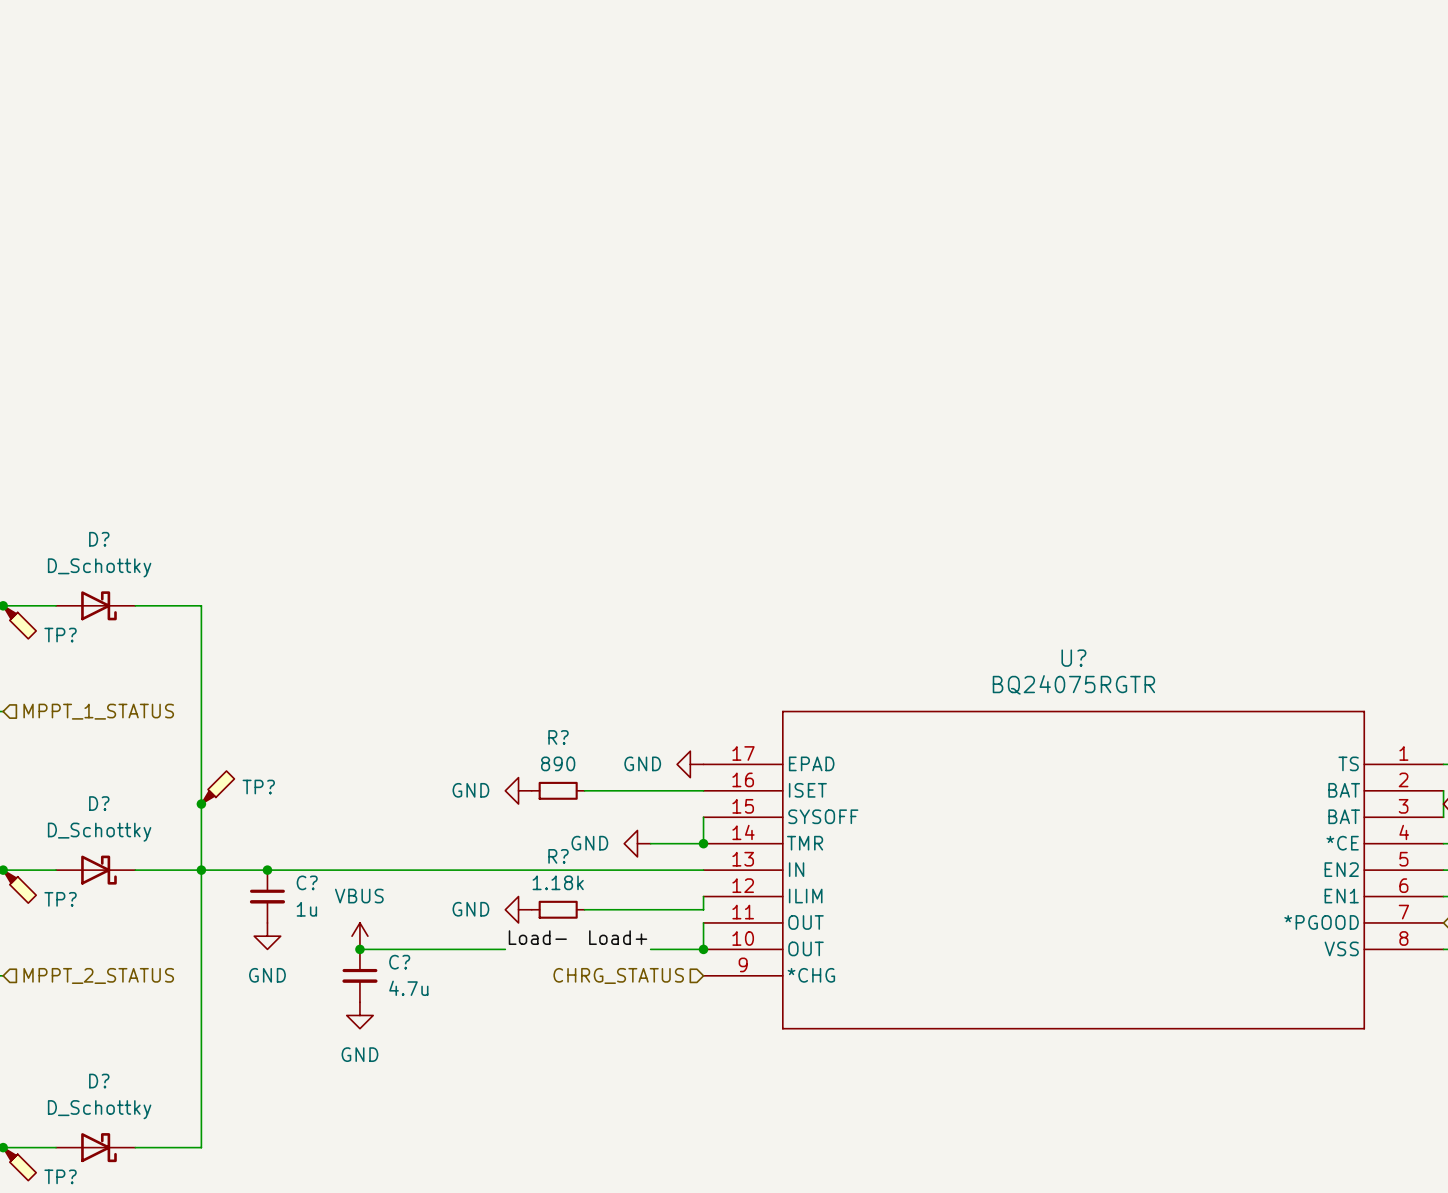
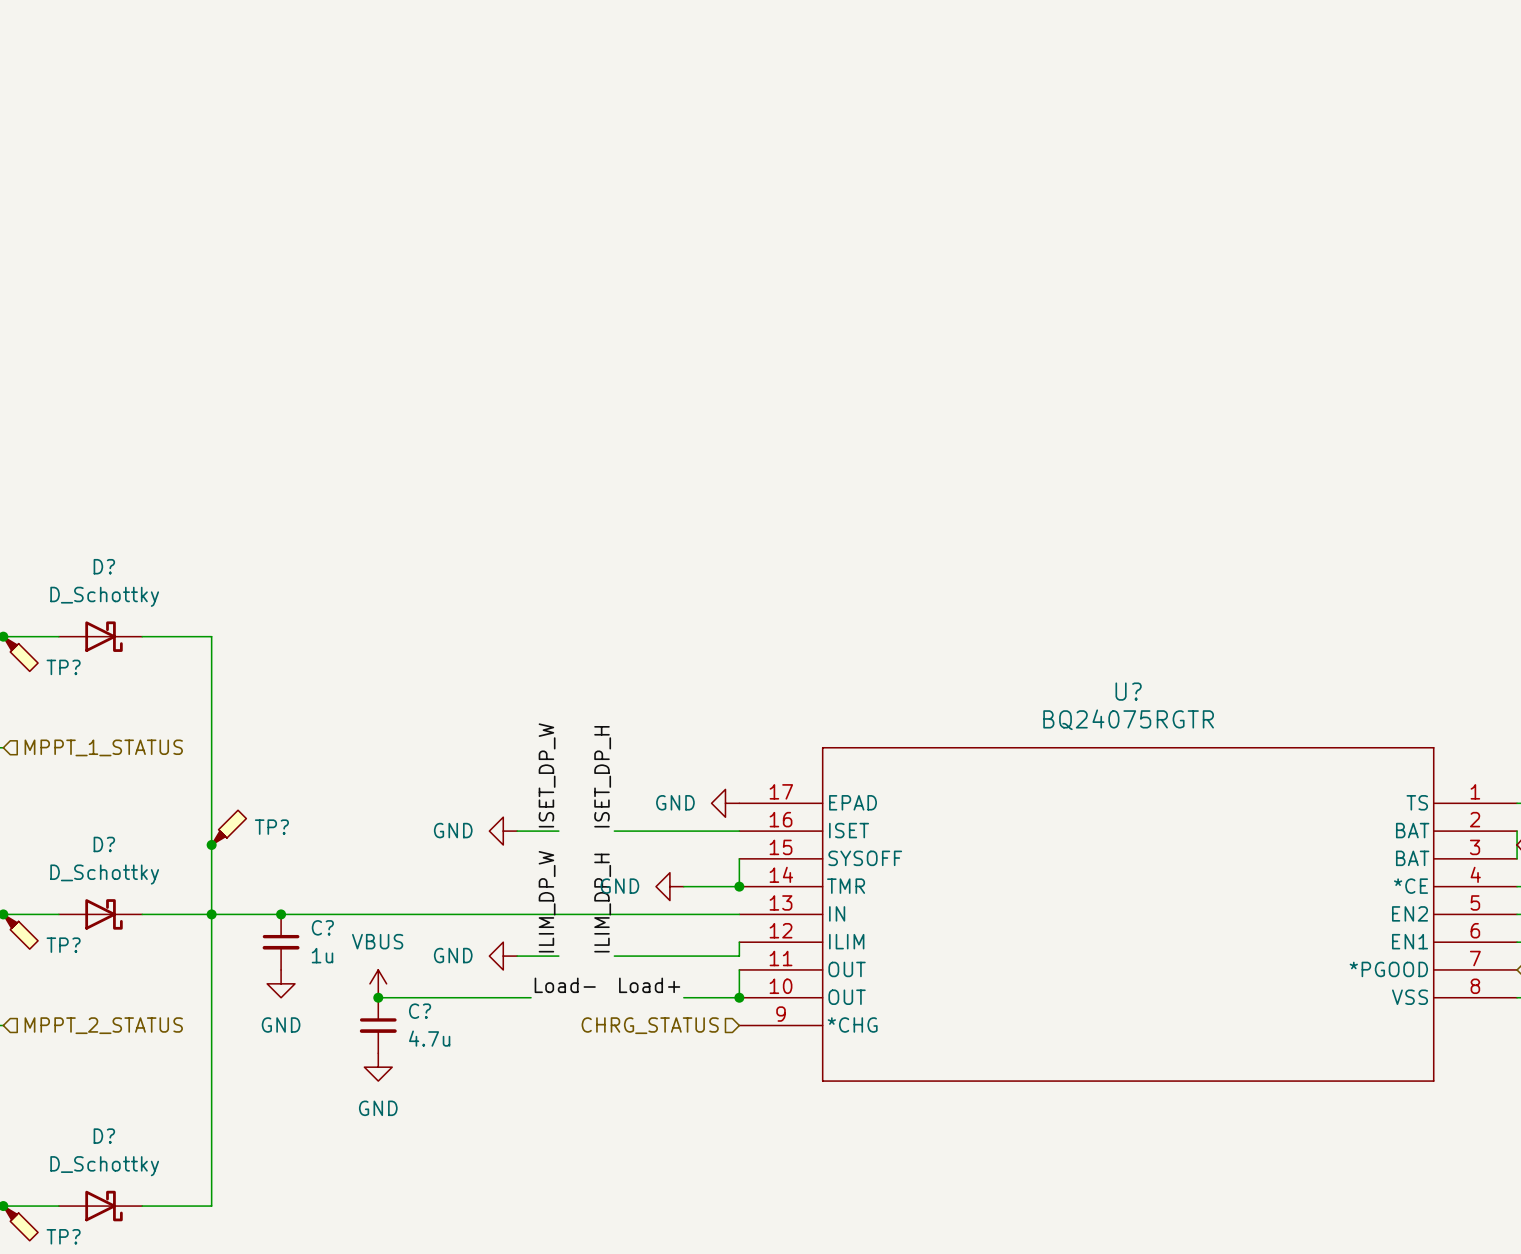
label: none -> ISET_DP_W (547, 775)
label: none -> ISET_DP_H (602, 776)
wire: none -> (517, 831) (558, 831)
power symbol position: GND (518, 790) -> GND (503, 831)
R?: 890 (558, 790) -> none
label: none -> ILIM_DP_W (547, 901)
label: none -> ILIM_DP_H (602, 903)
wire: none -> (517, 956) (558, 956)
power symbol position: GND (518, 909) -> GND (503, 956)
R?: 1.18k (558, 909) -> none

